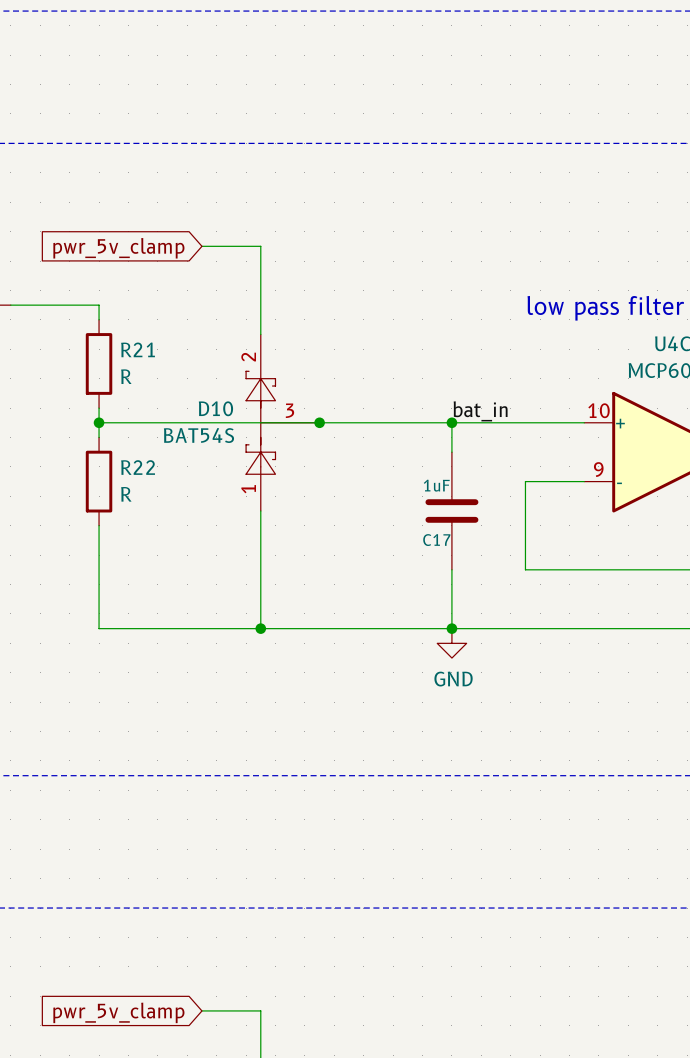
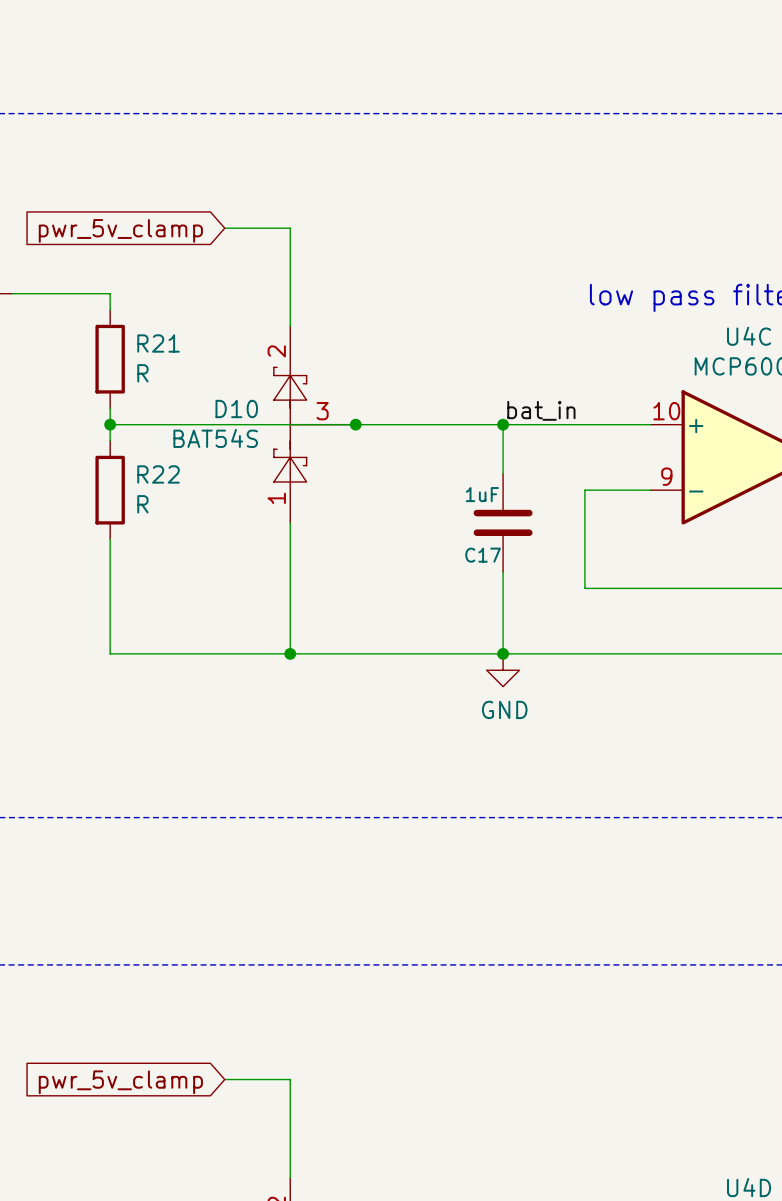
C17 symbol: [425, 452, 479, 570] -> [473, 473, 533, 573]

